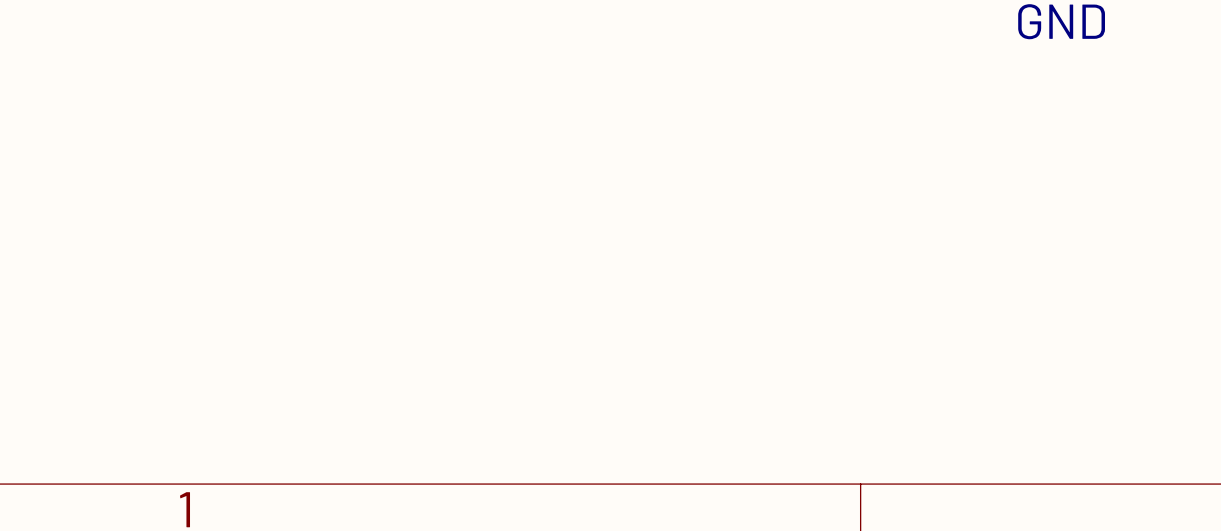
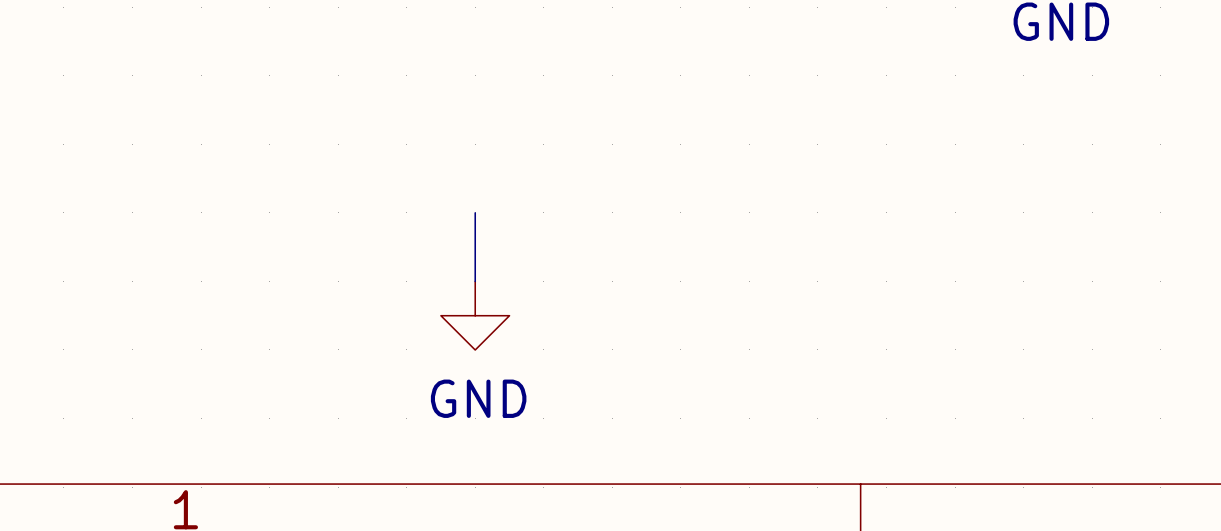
wire: none -> (475, 212) (475, 281)
power symbol: none -> GND (475, 315)

